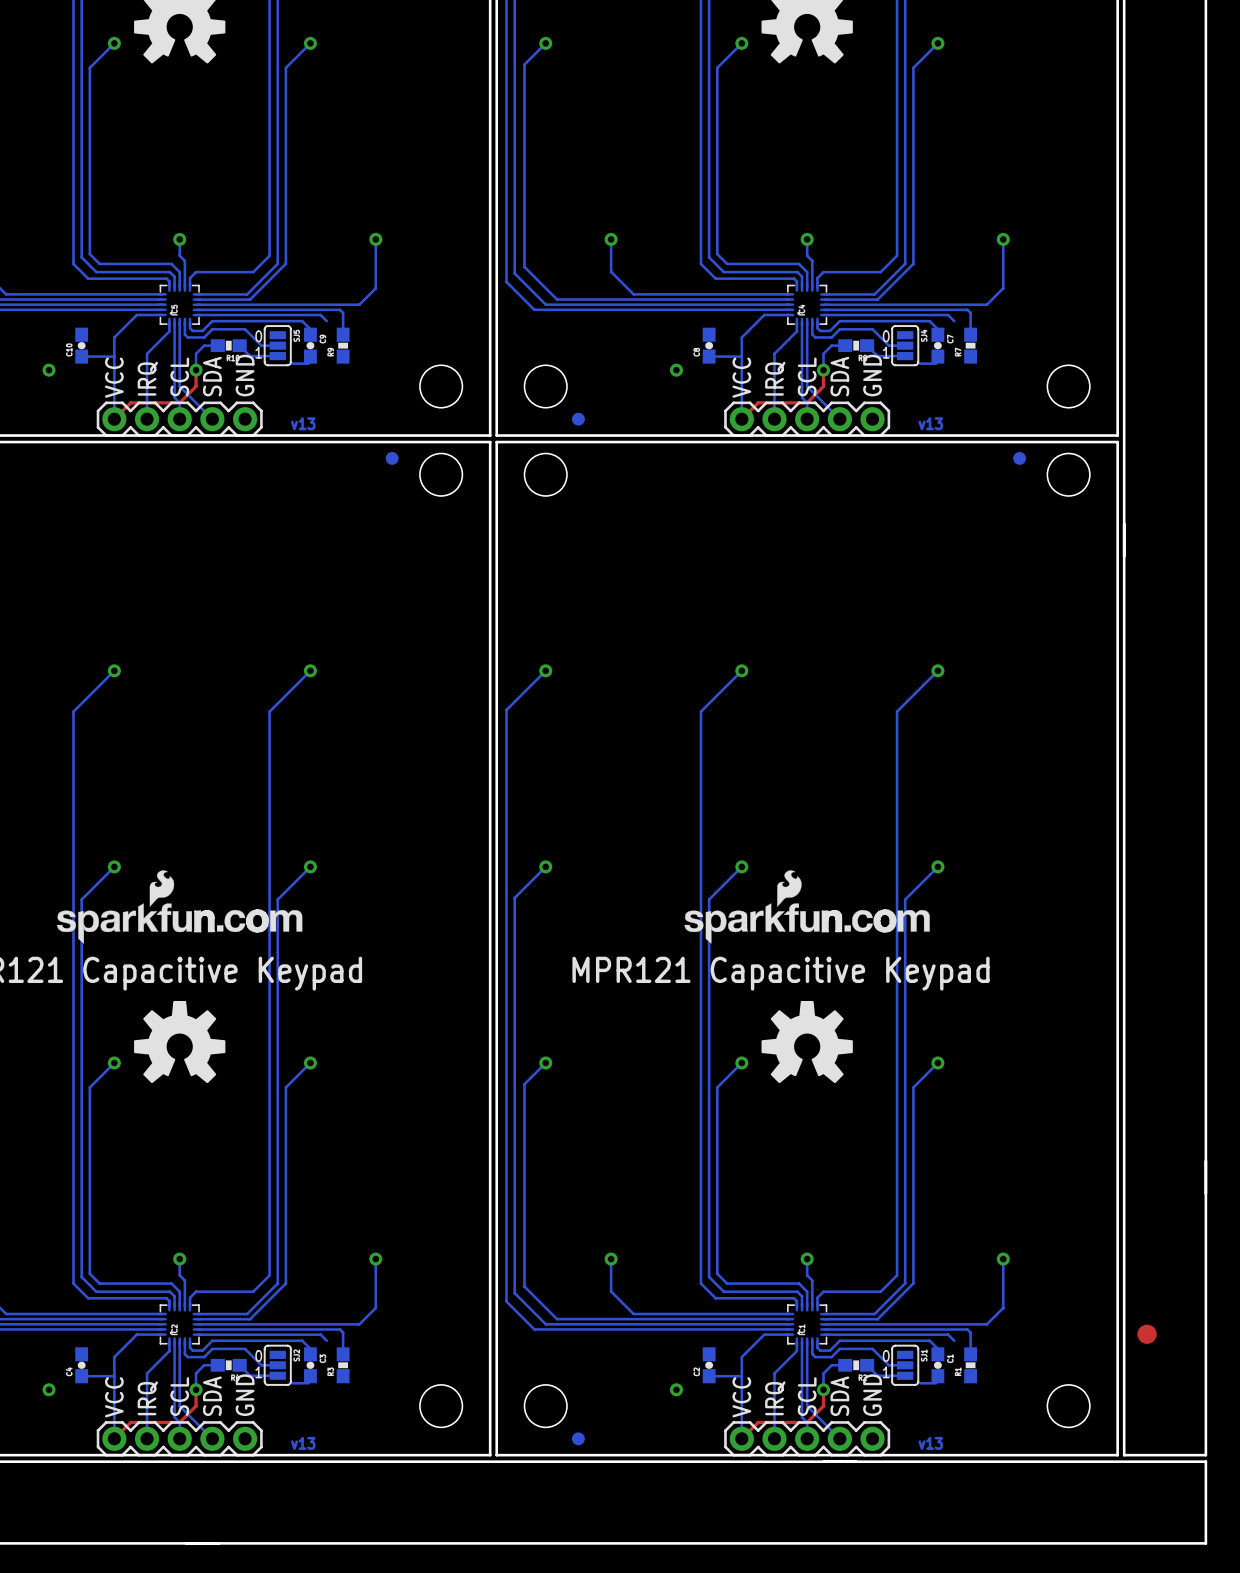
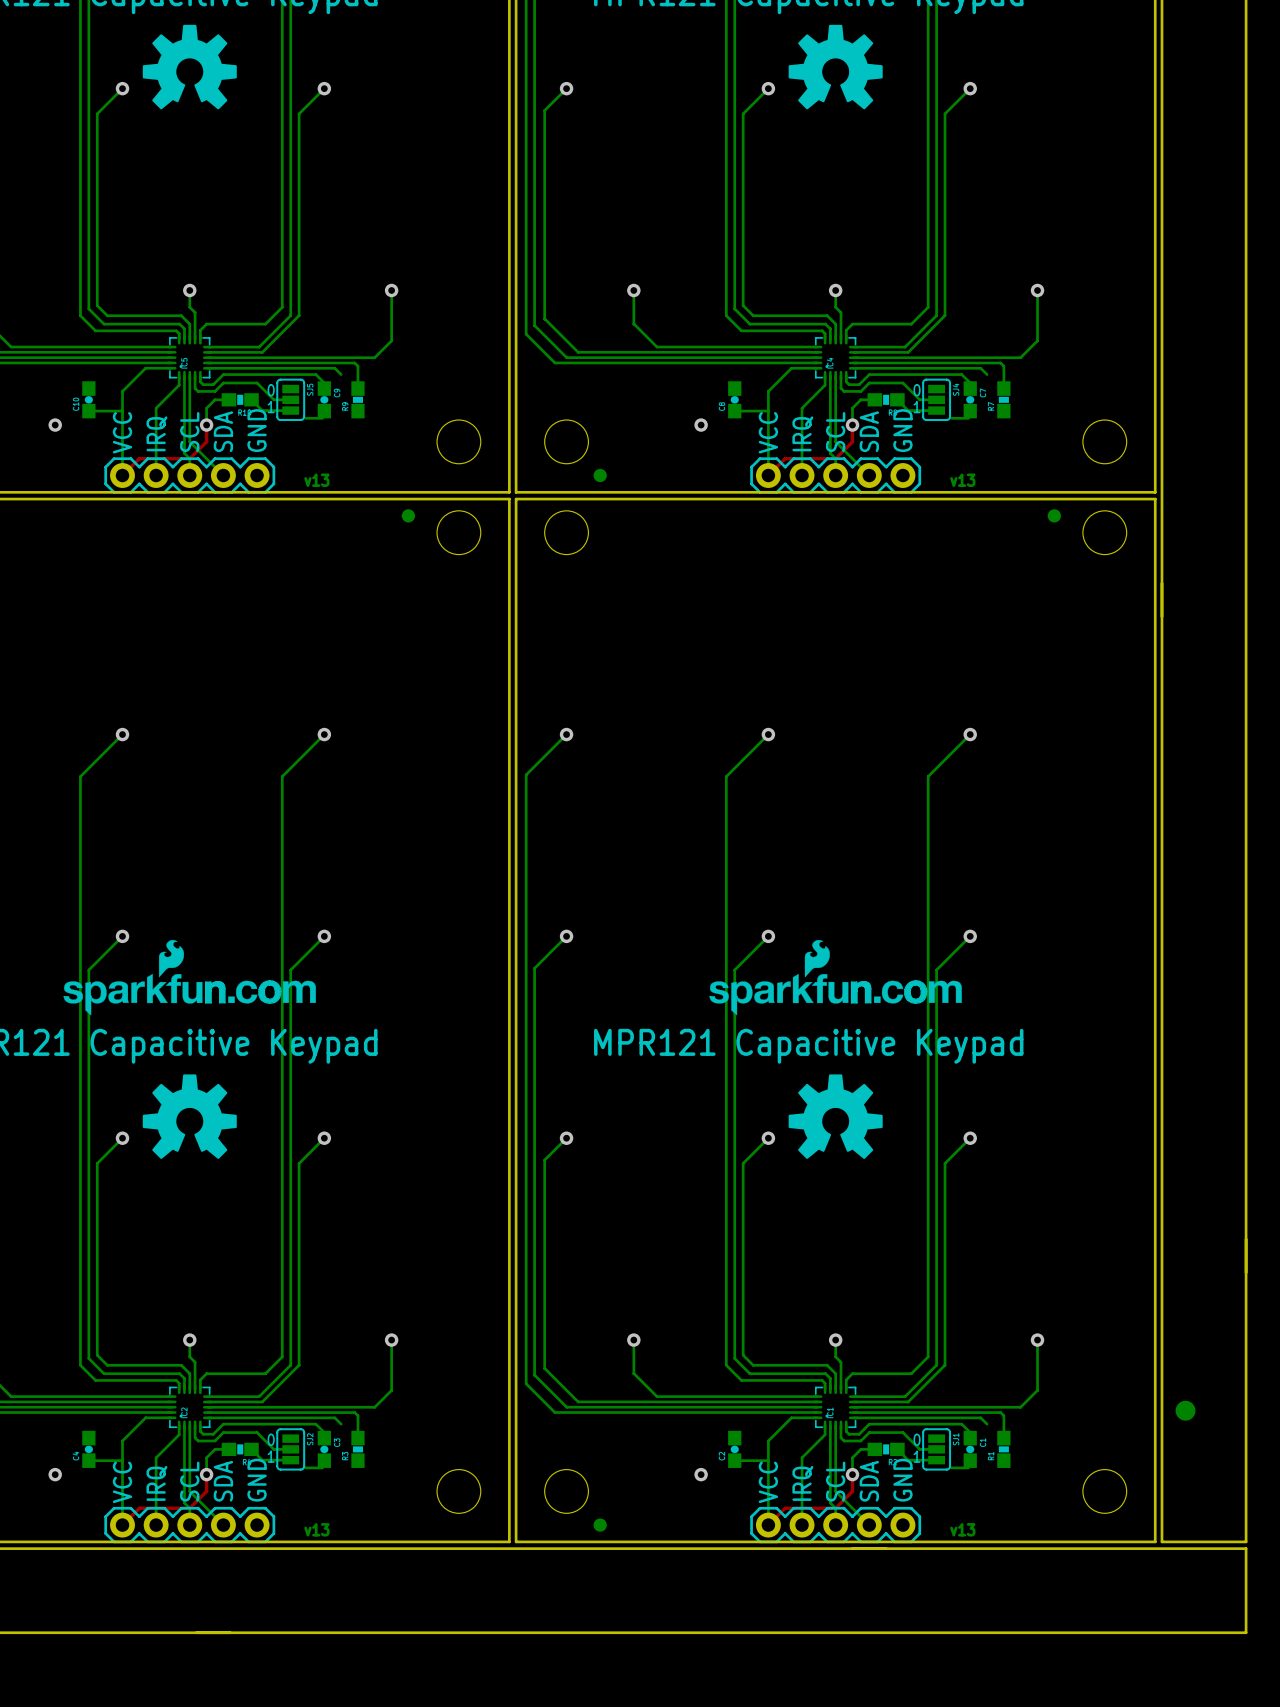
part side: top (1147, 1334) -> bottom (1185, 1410)

